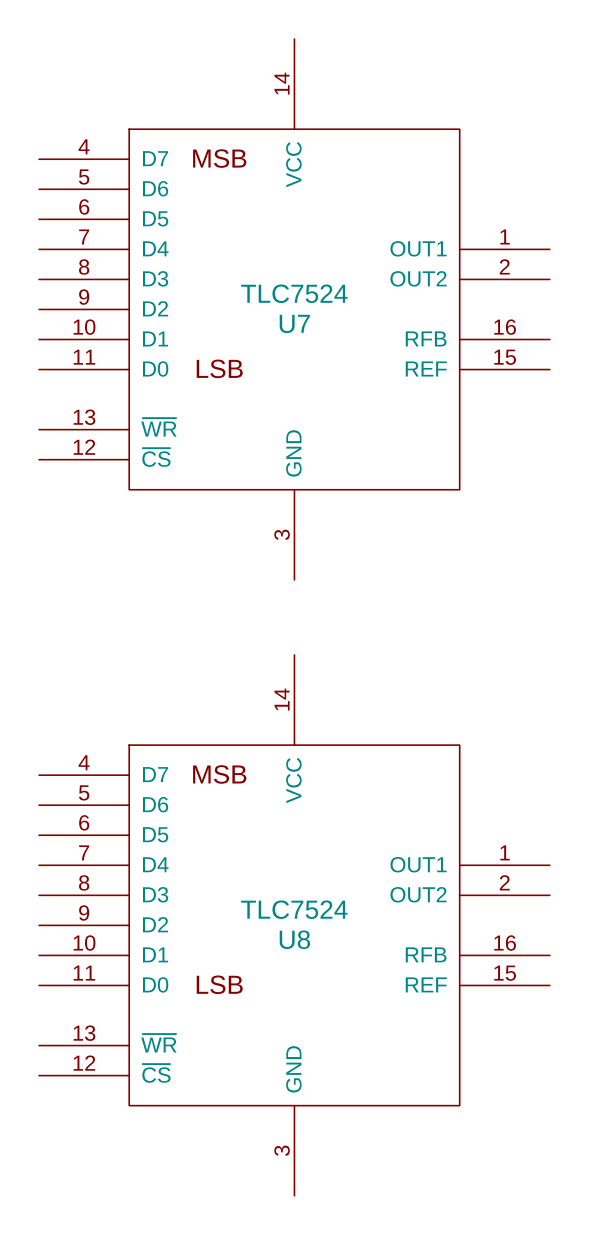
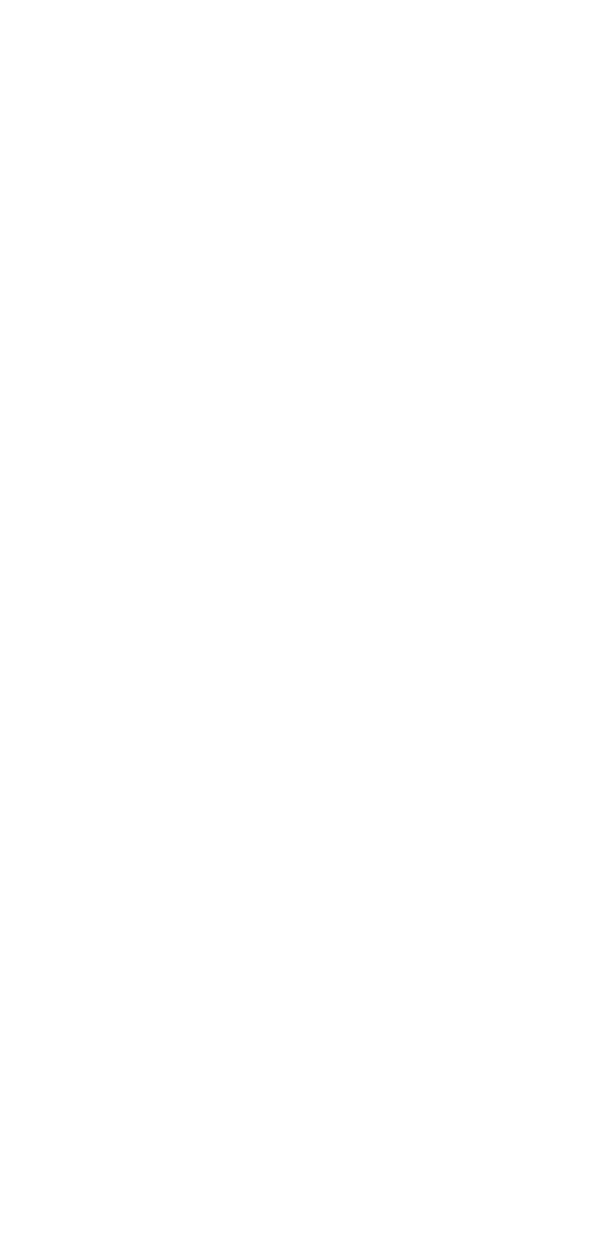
U7: TLC7524 (294, 309) -> none
U8: TLC7524 (294, 925) -> none

